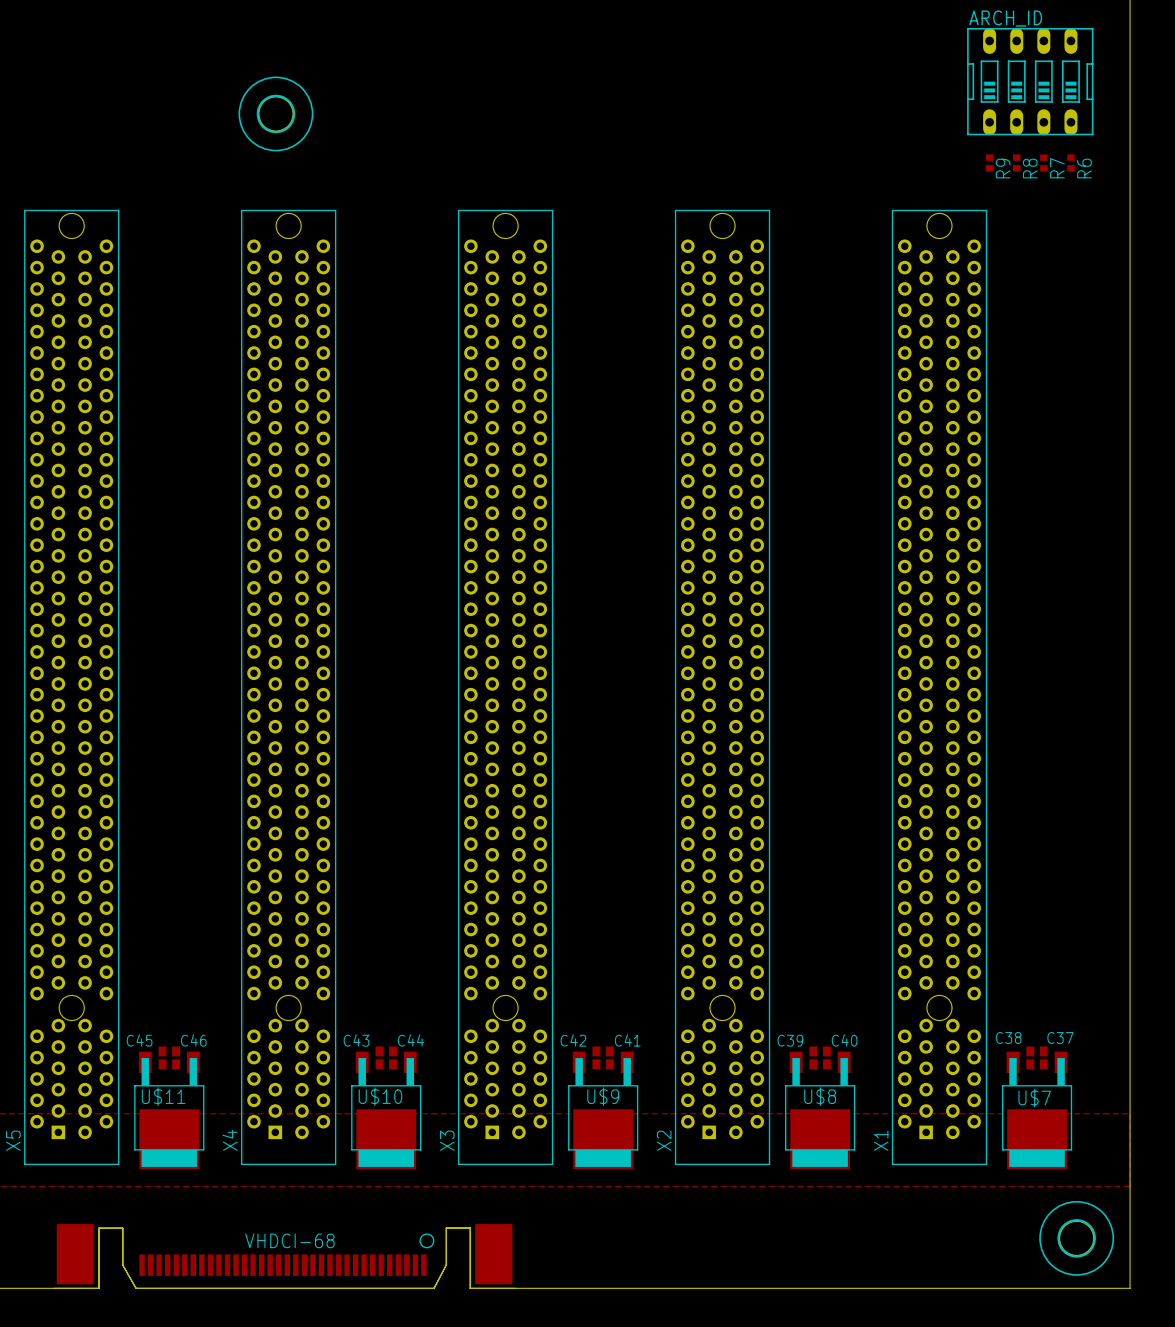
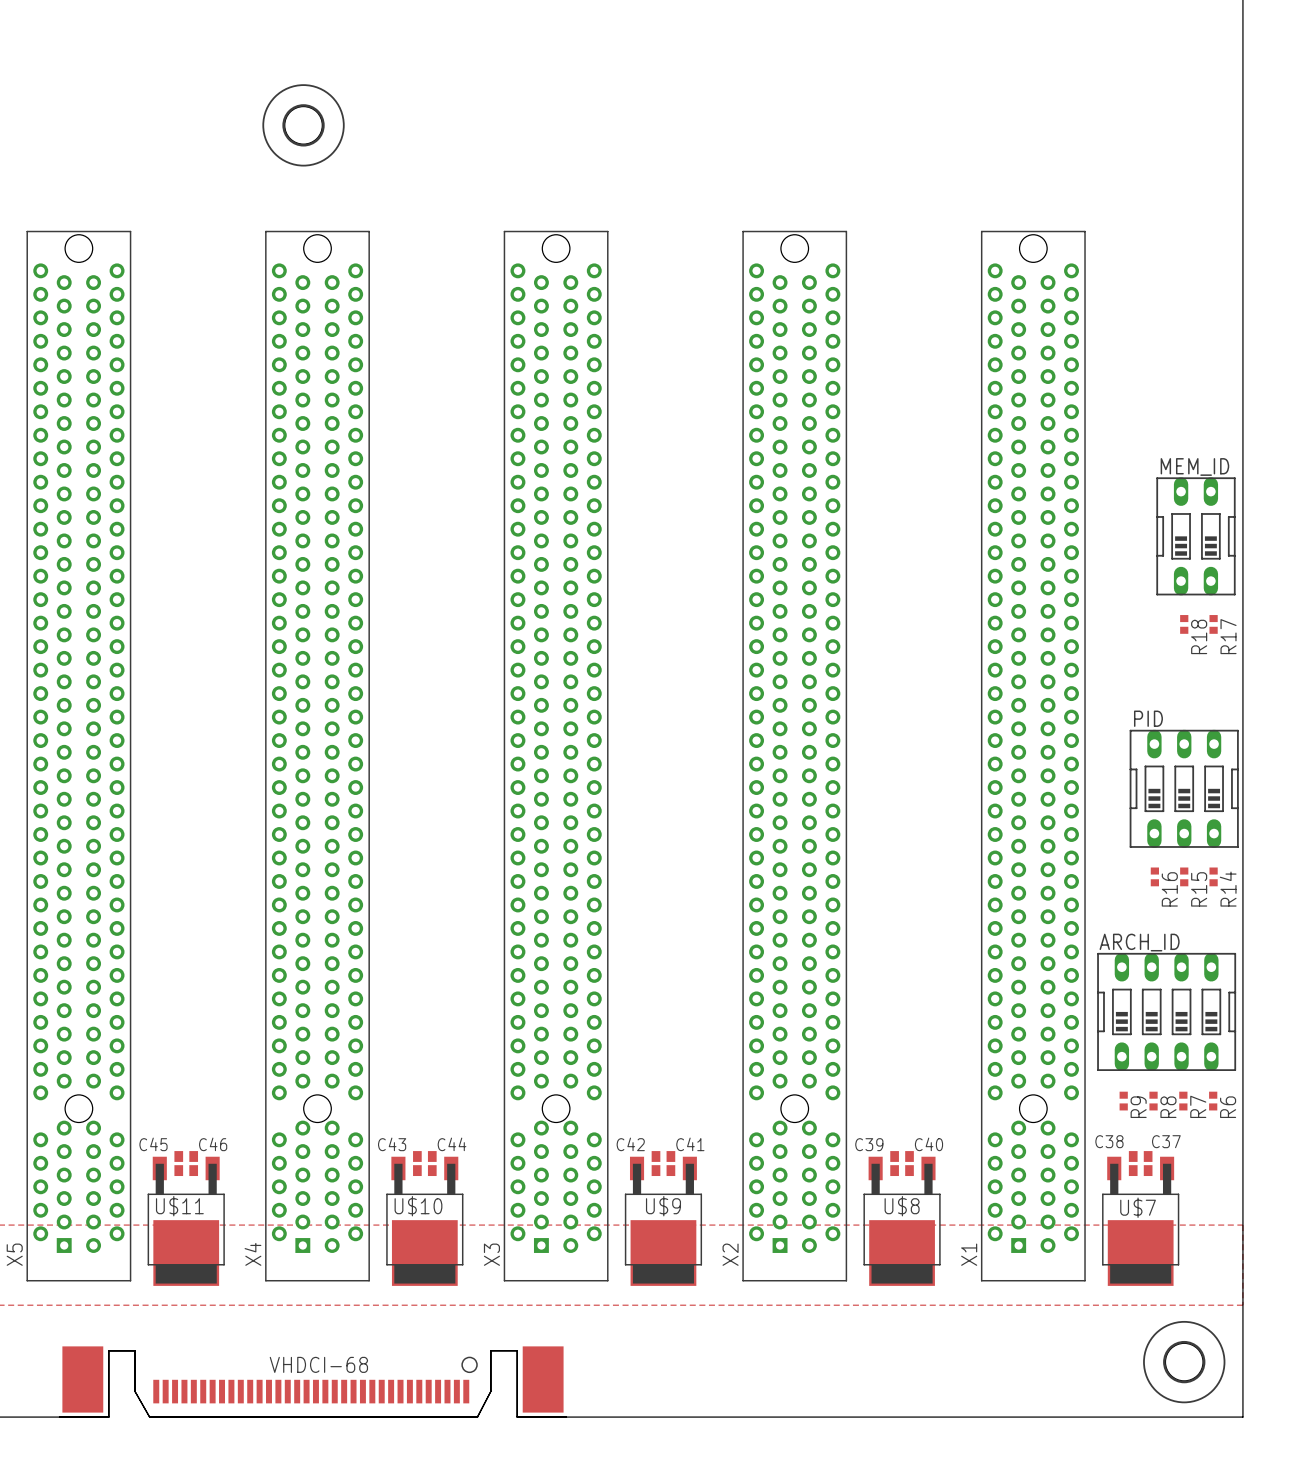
ARCH_ID: (1030, 81) -> none
R9 position: (989, 162) -> (1123, 1101)
R8 position: (1016, 162) -> (1153, 1101)
R7 position: (1043, 162) -> (1183, 1101)
R6 position: (1070, 162) -> (1213, 1101)
MEM_ID: none -> (1195, 536)
R18: none -> (1184, 624)
R17: none -> (1213, 624)
PID: none -> (1184, 788)
R16: none -> (1154, 876)
R15: none -> (1184, 876)
R14: none -> (1213, 876)
ARCH_ID: none -> (1166, 1011)

